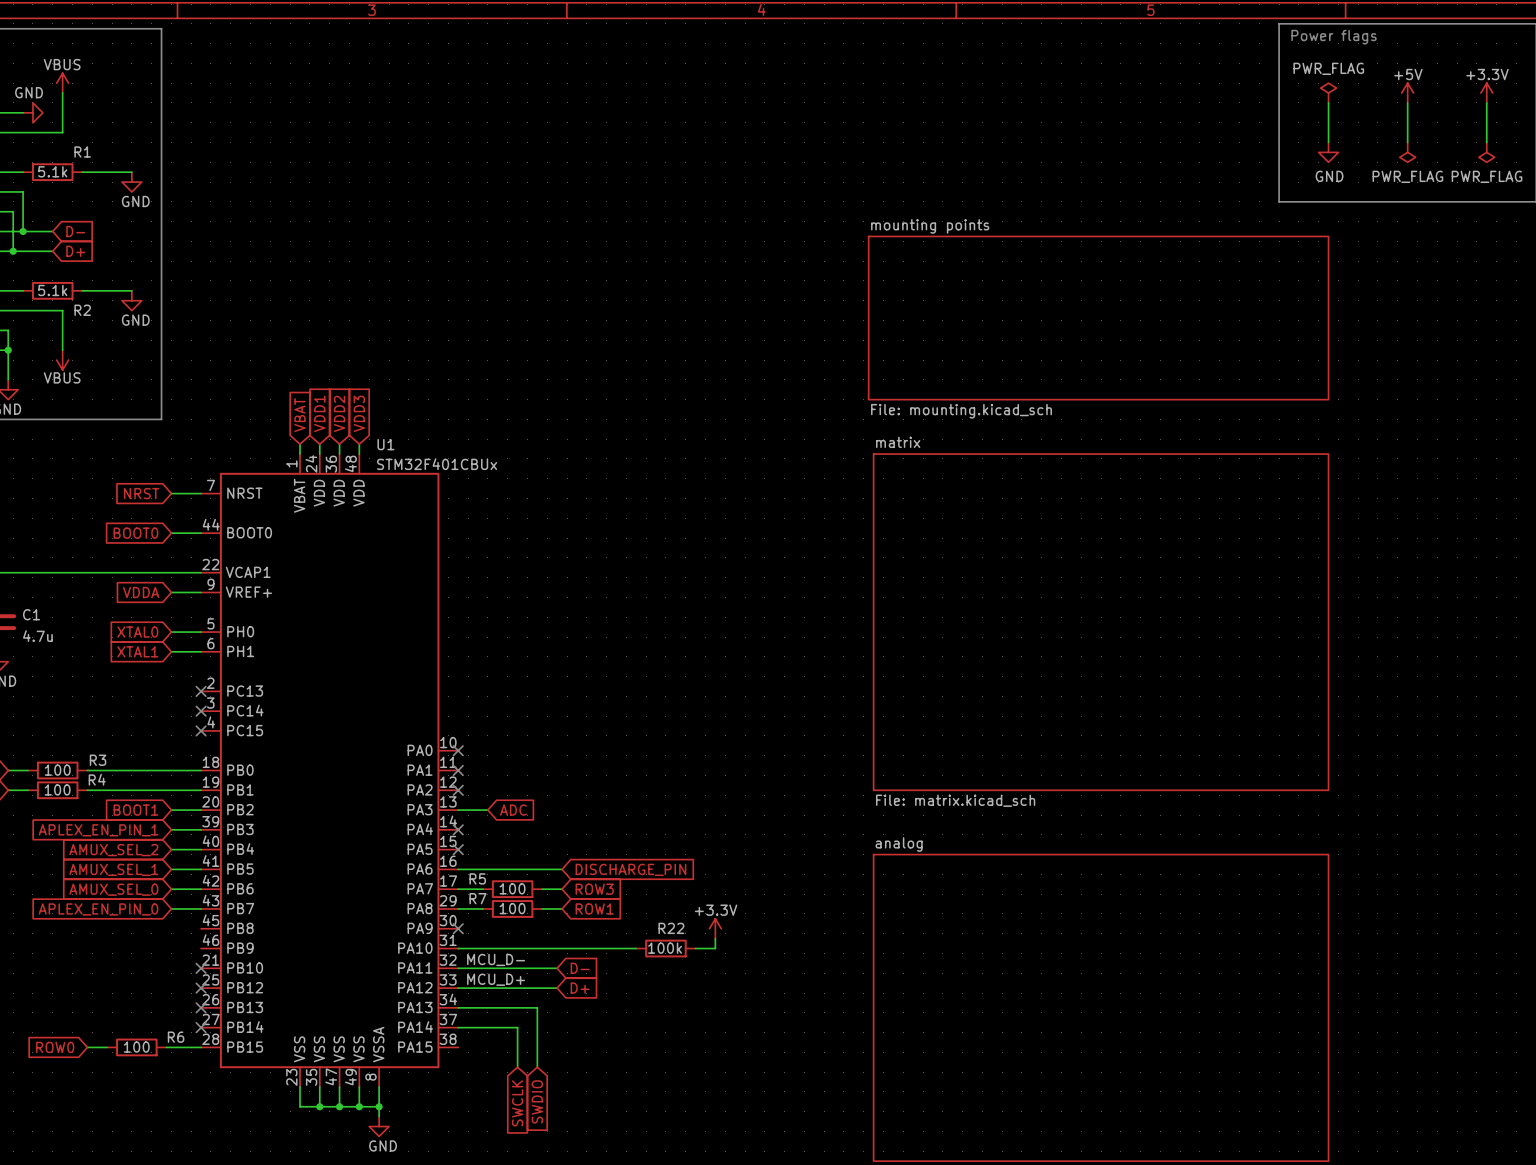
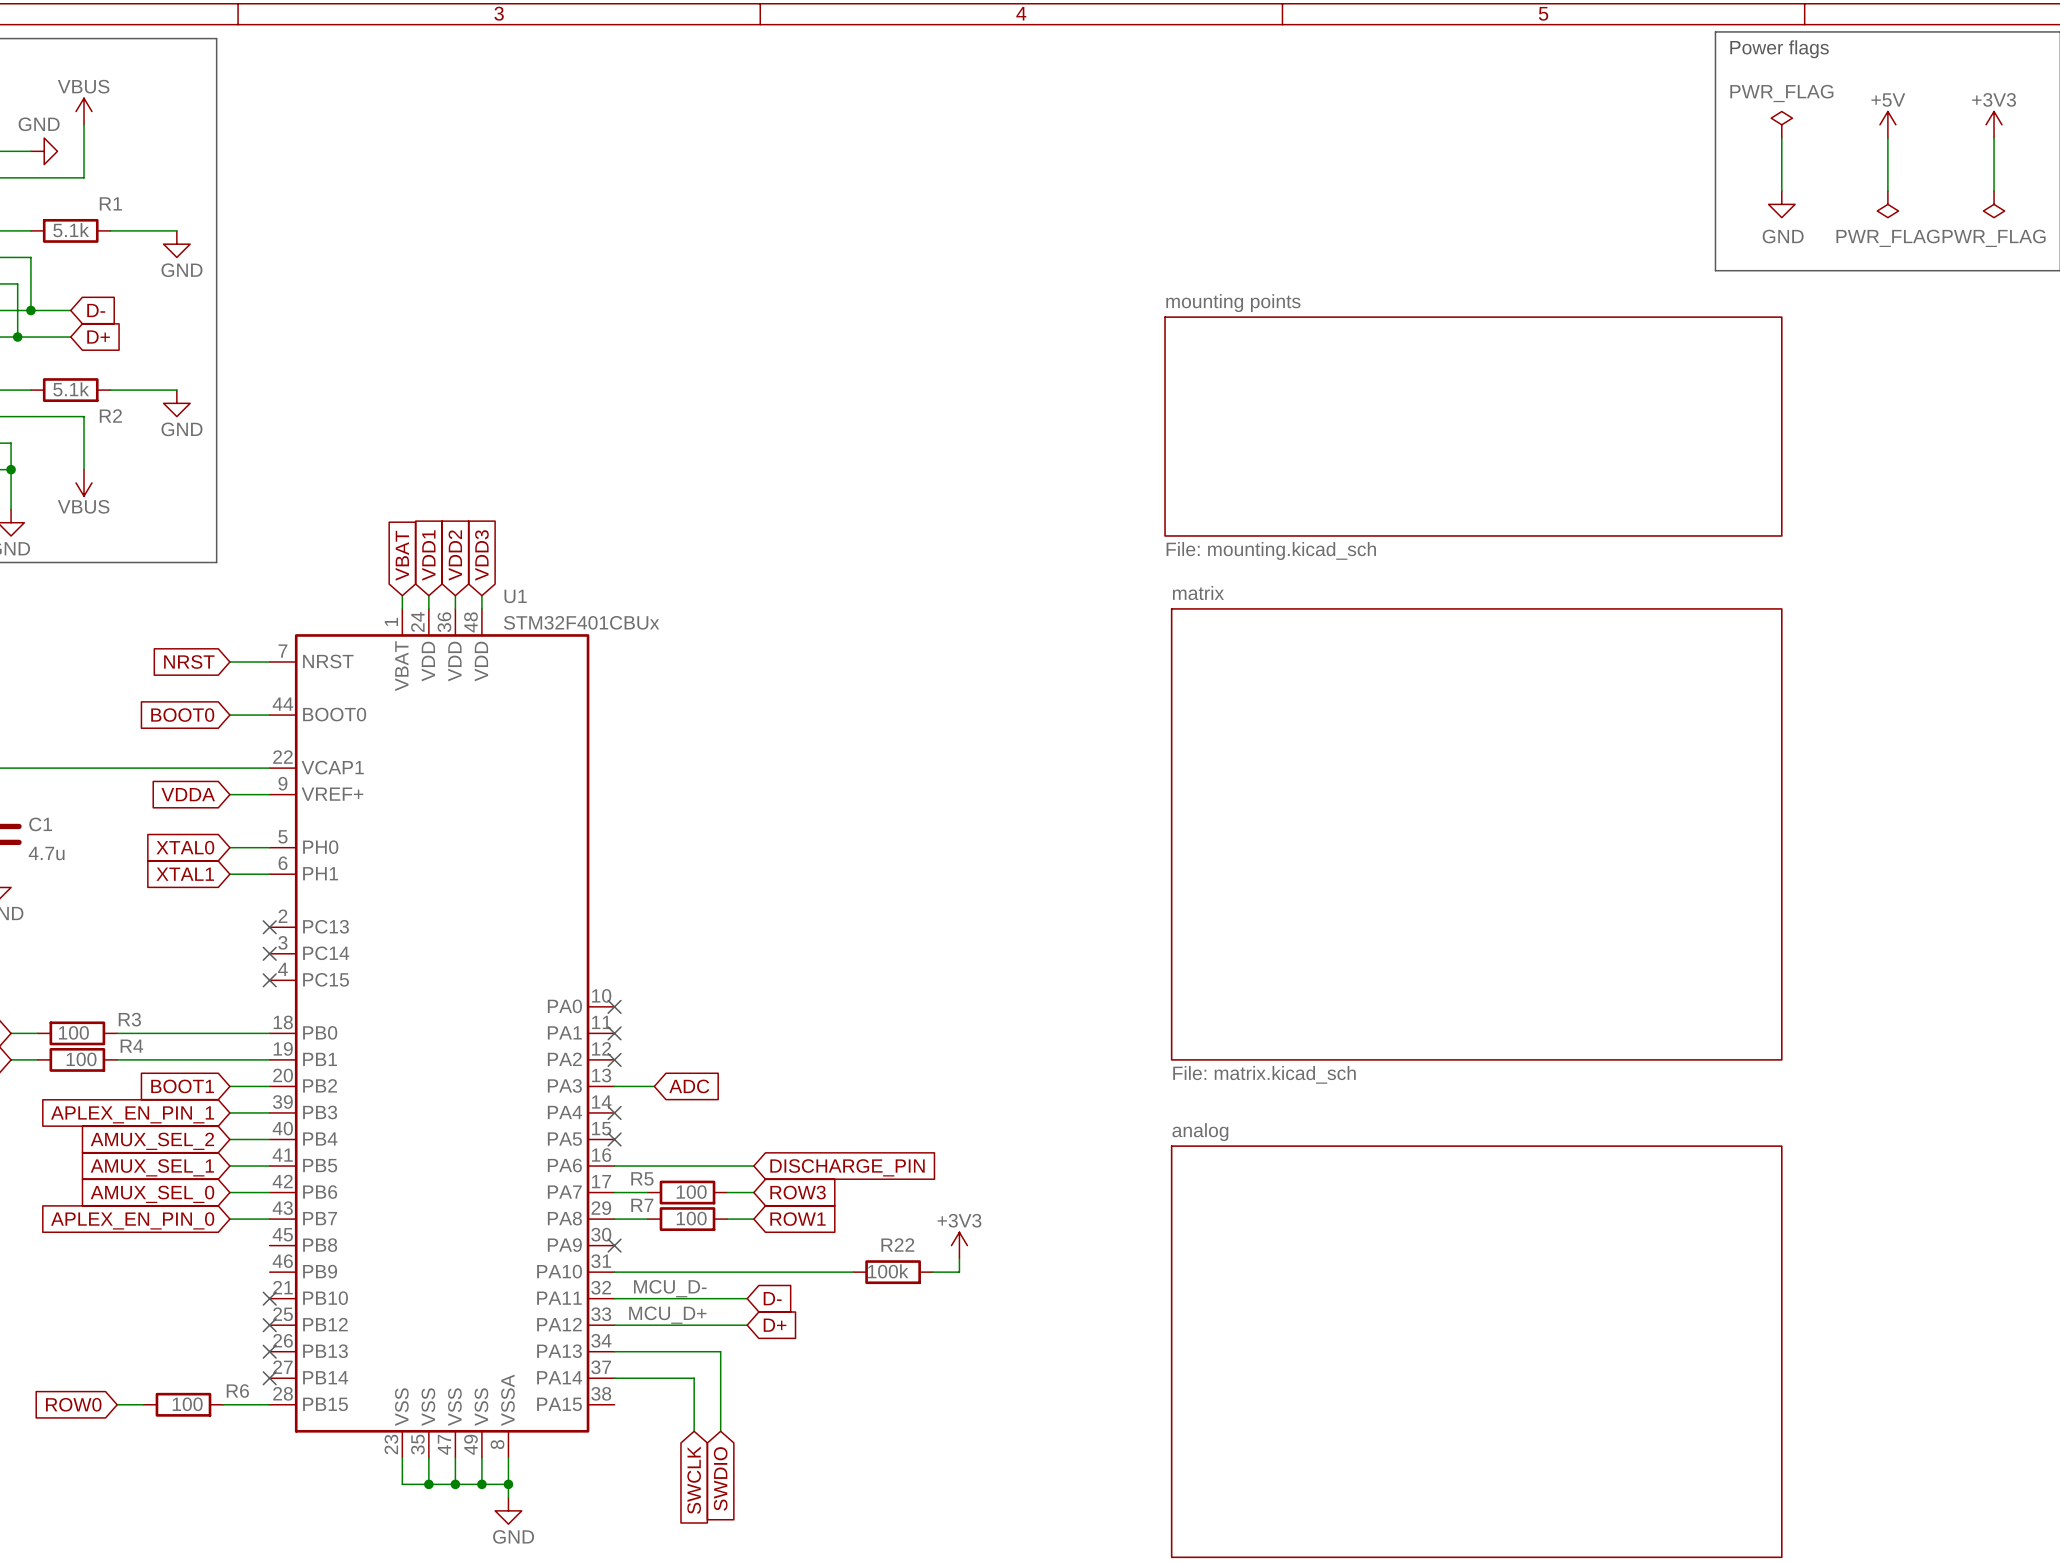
power symbol: +3.3V (1486, 93) -> +3V3 (1994, 124)
power symbol: +3.3V (715, 928) -> +3V3 (959, 1245)

